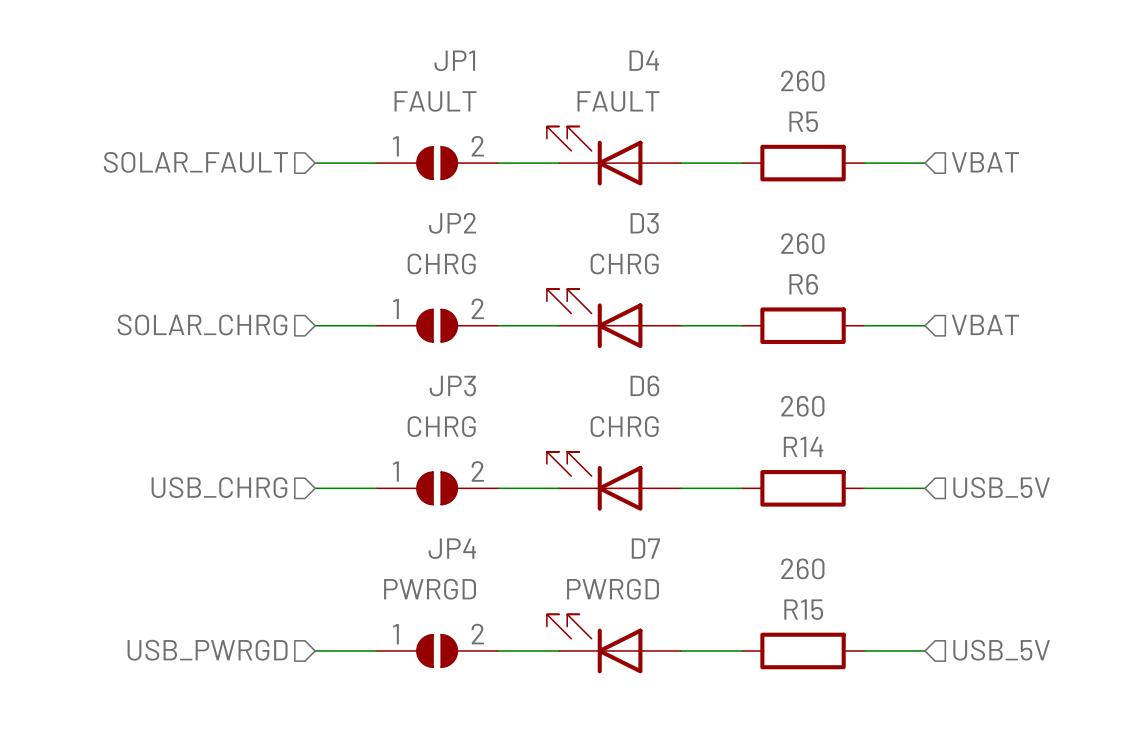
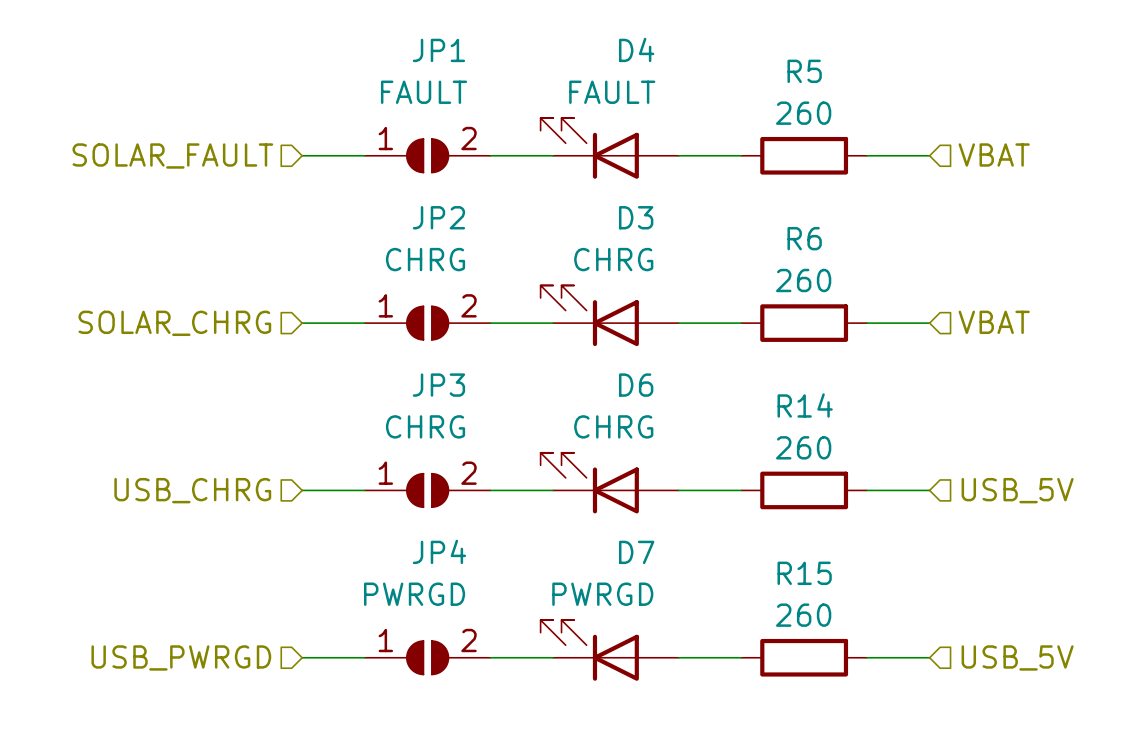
R5 value position: 260 (802, 81) -> 260 (803, 113)
R5 name position: R5 (803, 121) -> R5 (804, 71)
R6 value position: 260 (802, 243) -> 260 (803, 280)
R6 name position: R6 (803, 284) -> R6 (804, 238)
R14 value position: 260 (802, 406) -> 260 (803, 447)
R14 name position: R14 (803, 446) -> R14 (805, 405)
R15 value position: 260 (802, 568) -> 260 (803, 615)
R15 name position: R15 (803, 609) -> R15 (804, 573)

